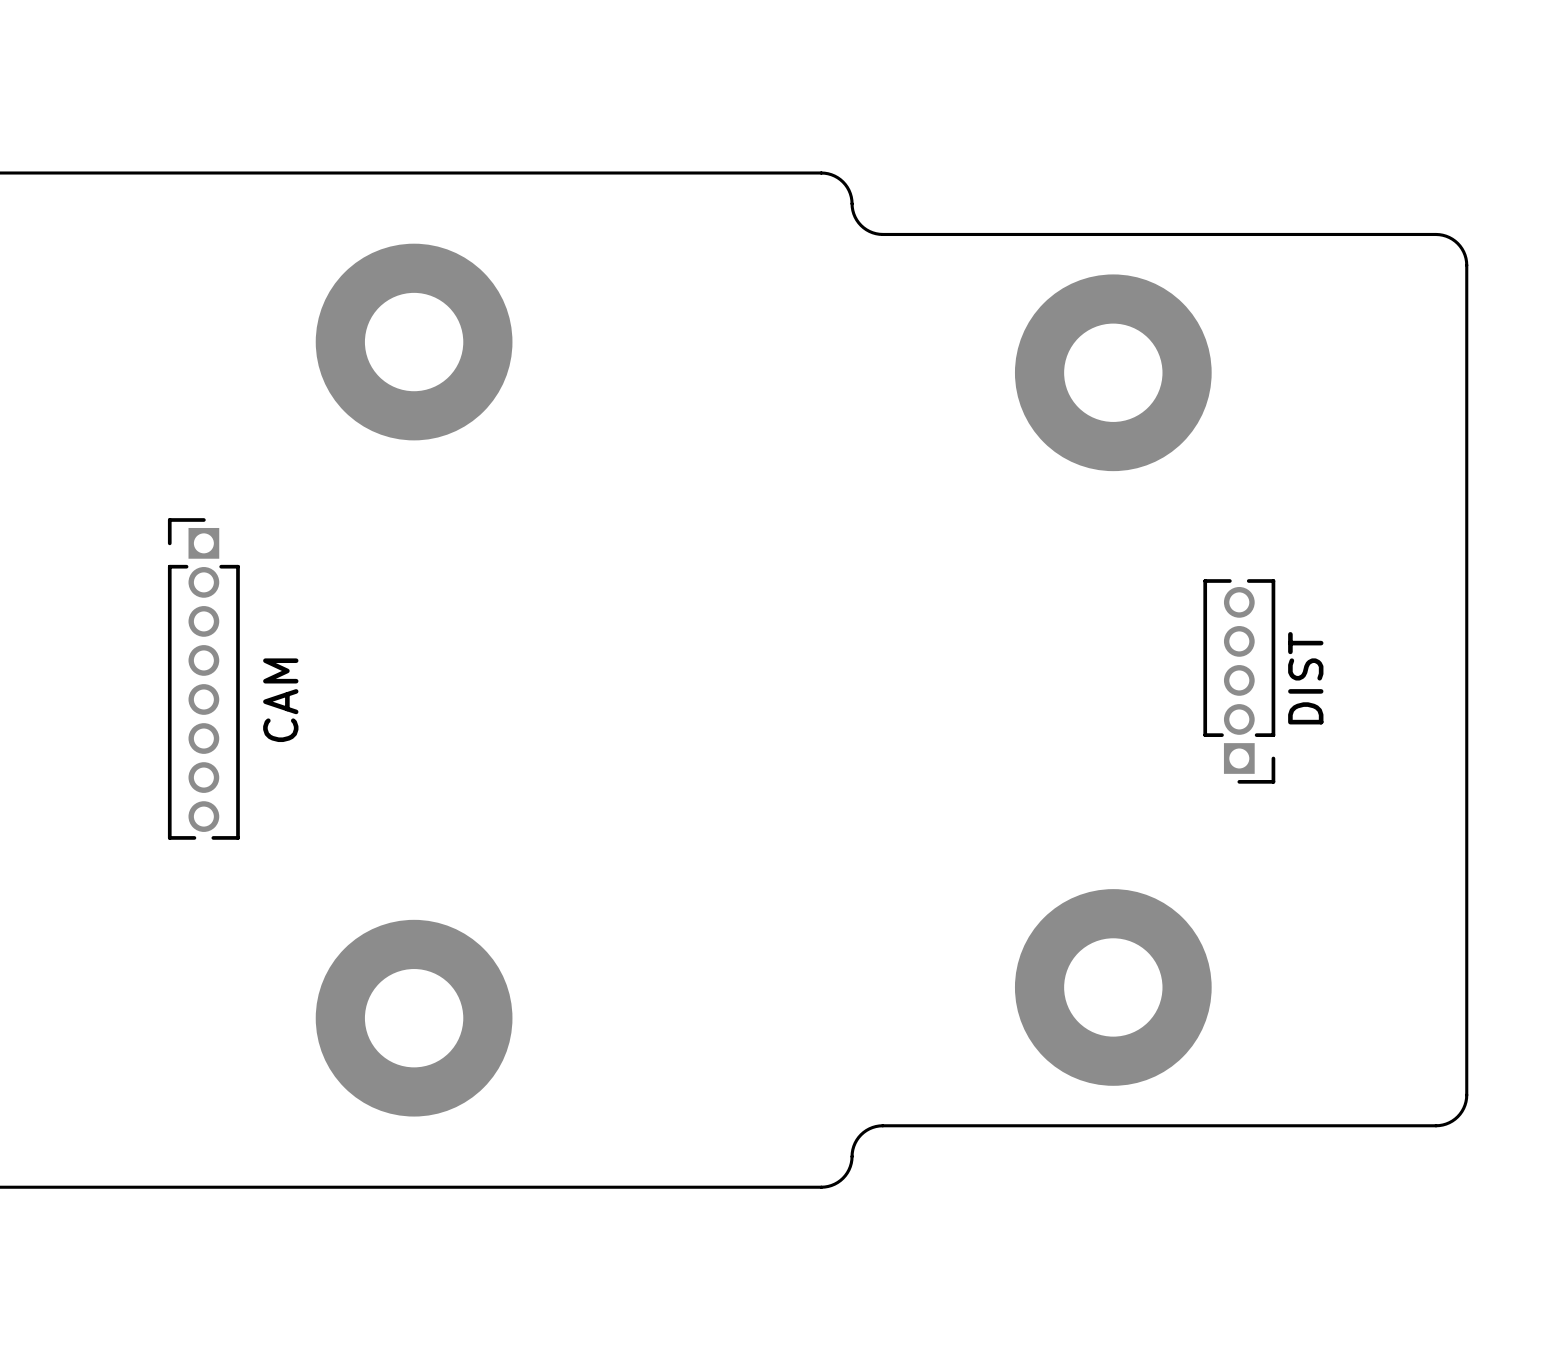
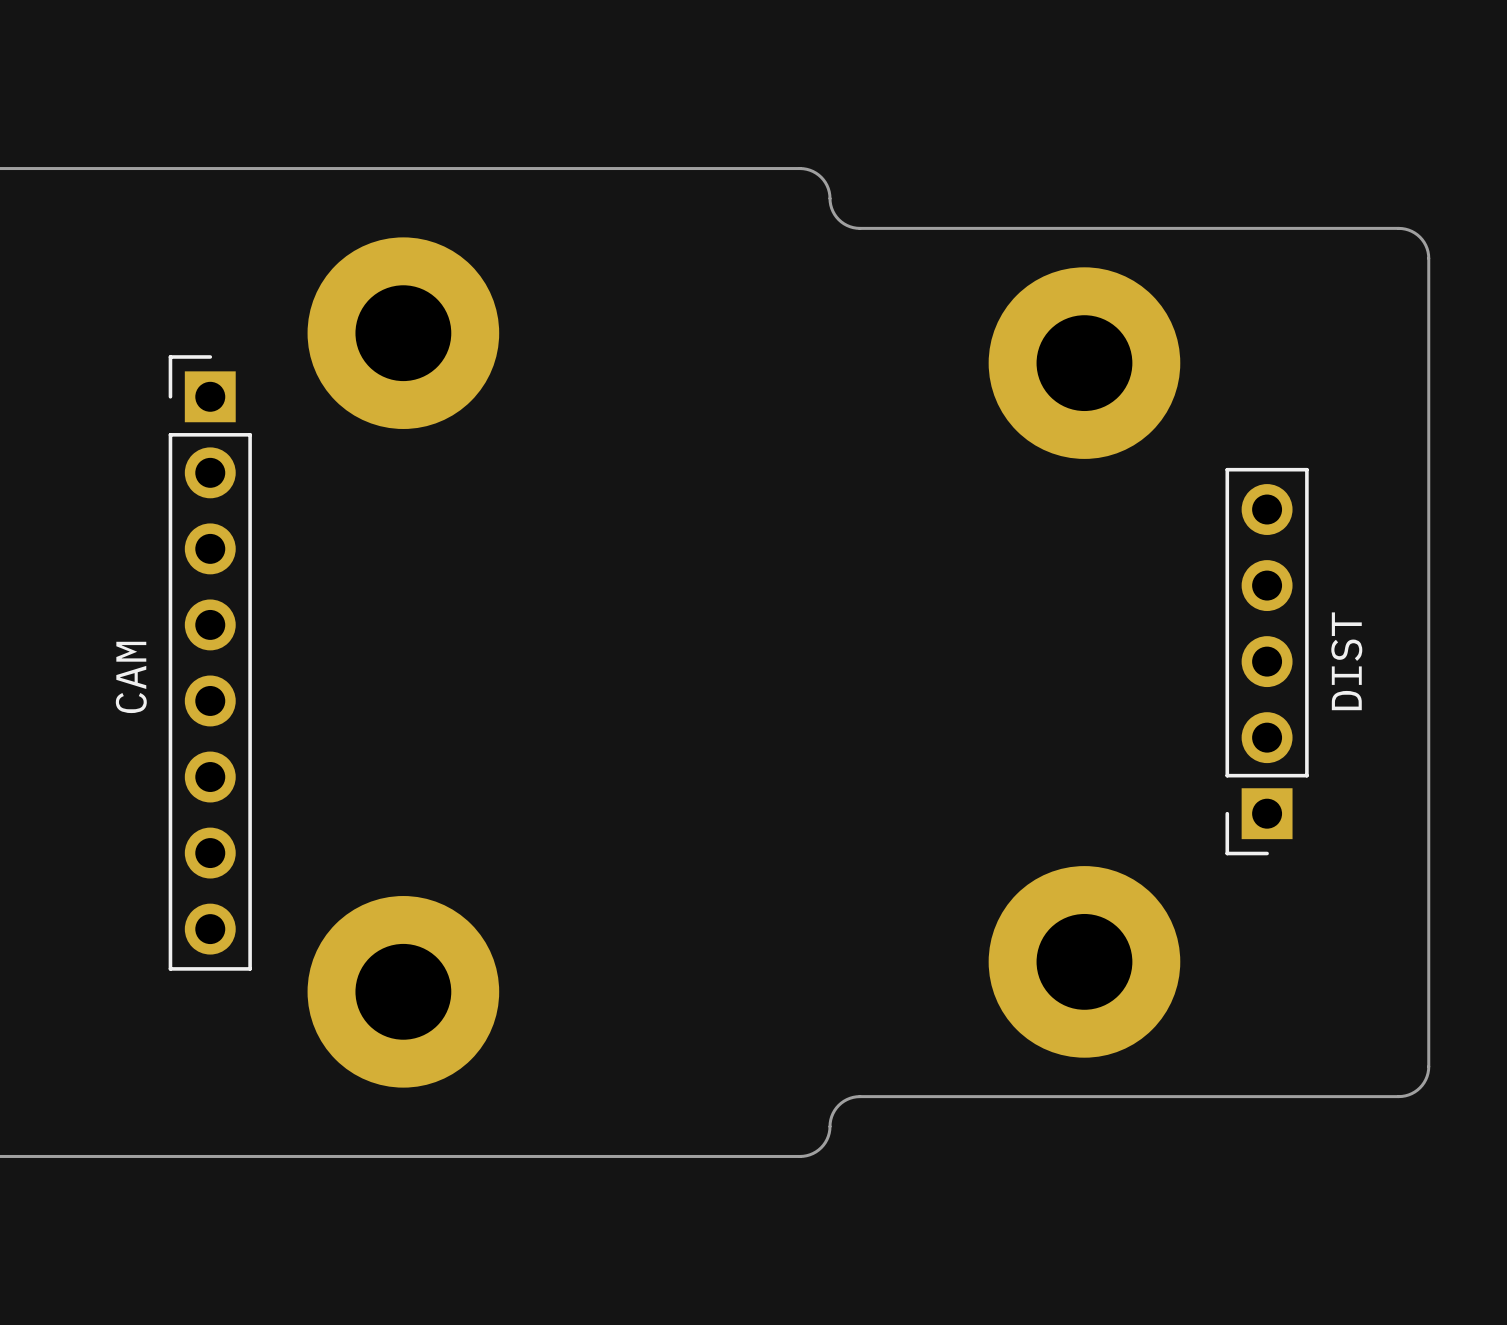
CAM footprint: [167, 518, 240, 840] -> [168, 355, 252, 971]
DIST: none -> (1267, 661)
DIST: (1239, 681) -> none
CAM name position: CAM (280, 700) -> CAM (131, 677)

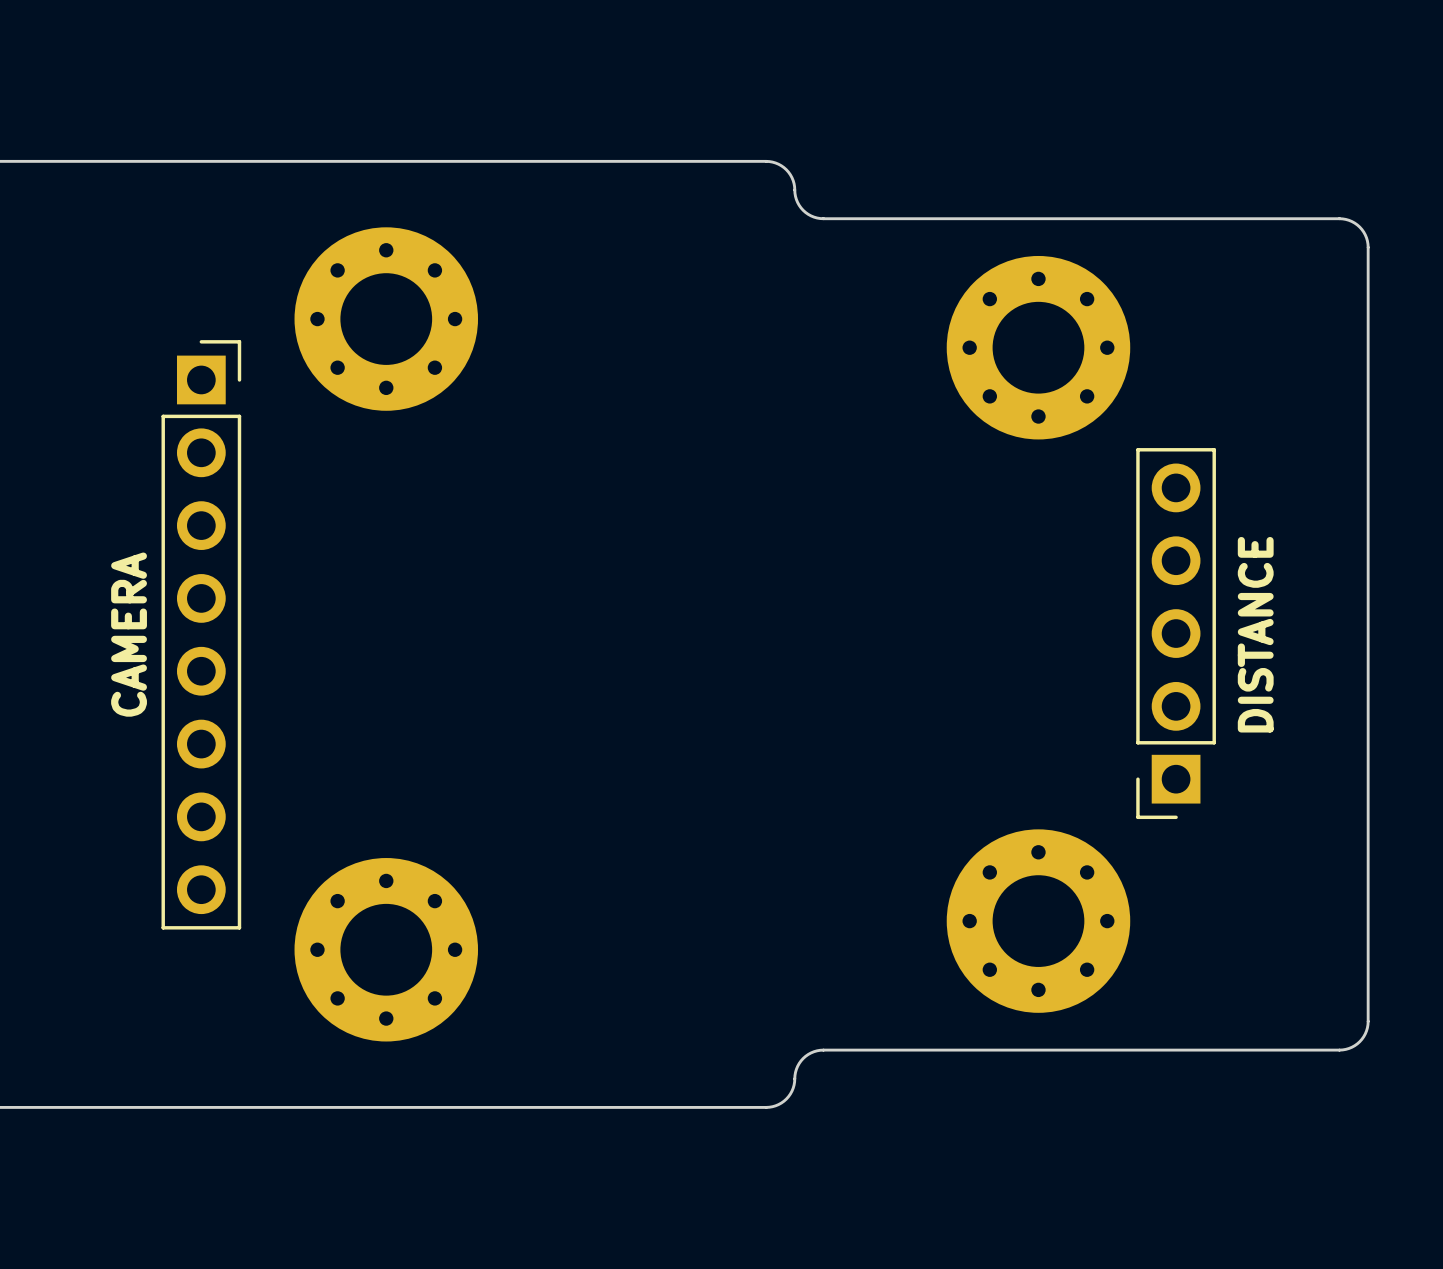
part footprint: [307, 237, 500, 429] -> [294, 227, 479, 411]
part footprint: [988, 267, 1181, 459] -> [946, 255, 1131, 440]
part: none -> (1176, 633)
DIST: (1267, 661) -> none
CAM: (210, 662) -> none
part: none -> (201, 634)
text: none -> DISTANCE (1255, 634)
text: none -> CAMERA (129, 634)
part footprint: [988, 866, 1181, 1058] -> [946, 829, 1131, 1013]
part footprint: [307, 896, 500, 1088] -> [294, 858, 479, 1042]

